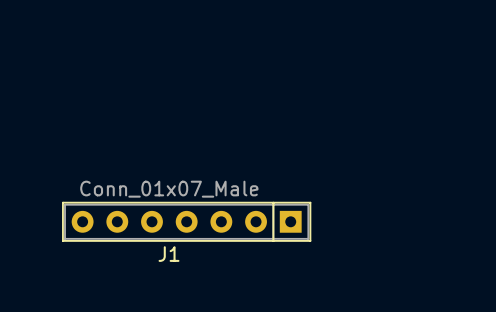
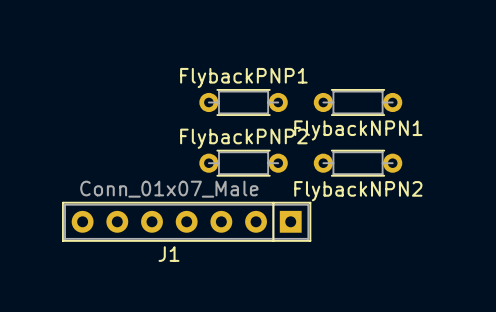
FlybackPNP1: none -> (243, 102)
FlybackNPN1: none -> (358, 102)
FlybackPNP2: none -> (243, 163)
FlybackNPN2: none -> (358, 163)

